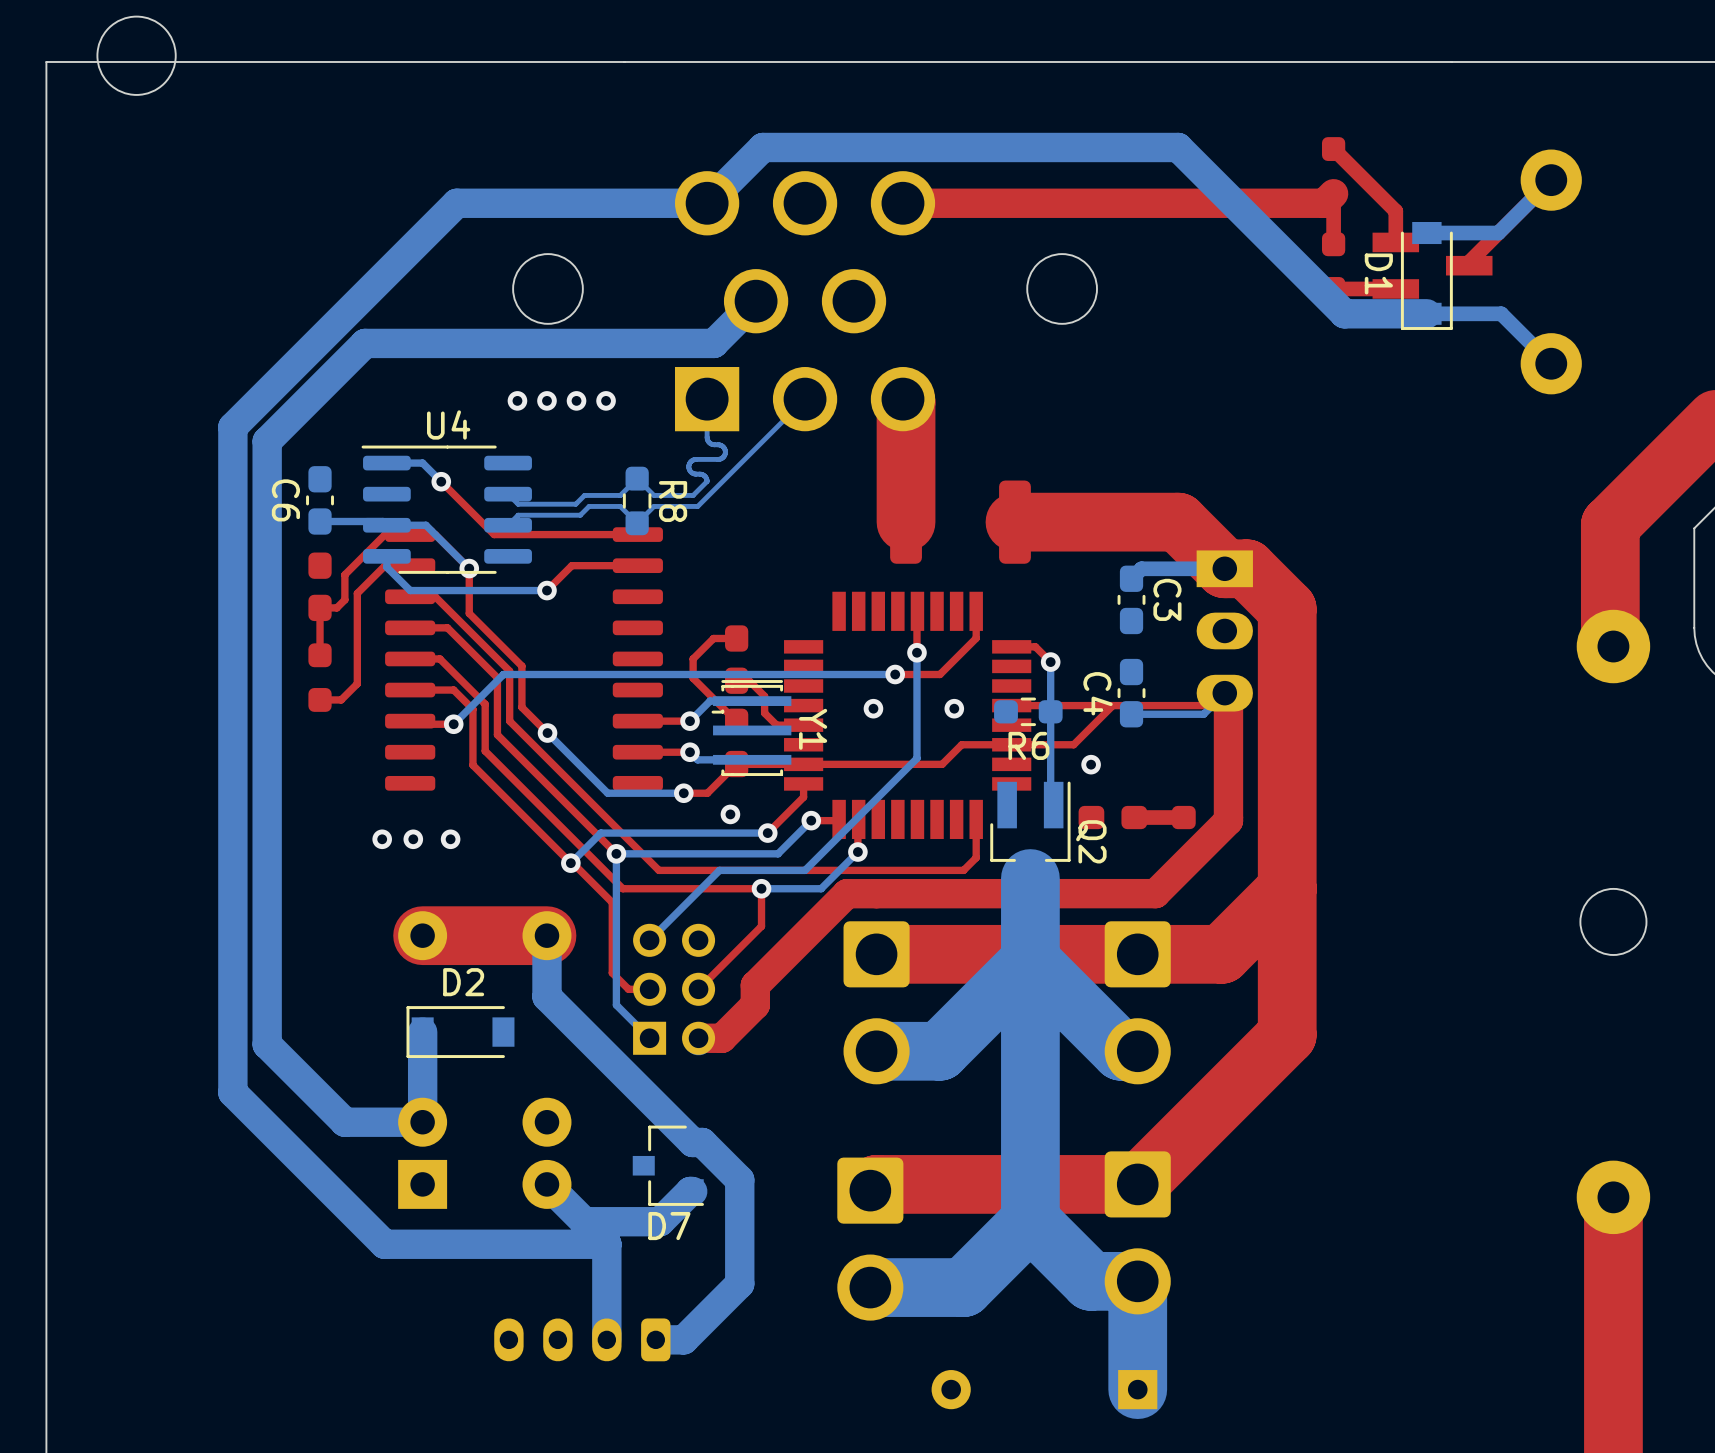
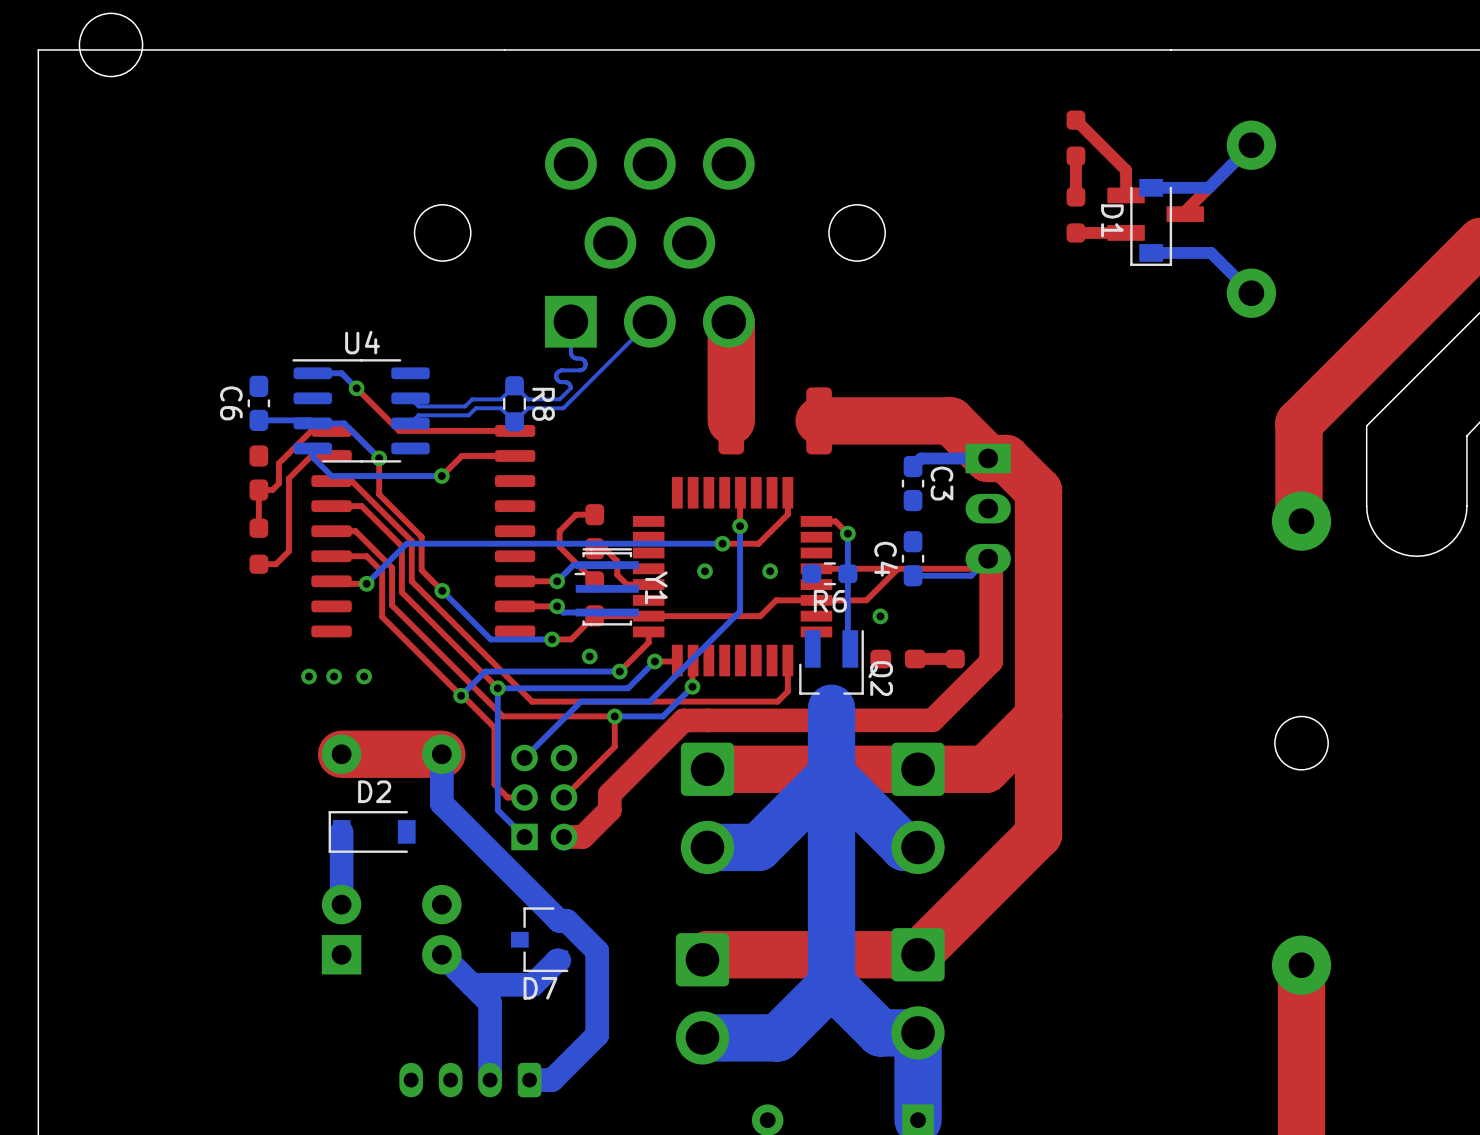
top track: (1333, 193) (1324, 203) (902, 203) -> none
bottom track: (756, 301) (713, 343) (365, 343) (267, 441) (267, 1044) (344, 1122) (422, 1122) -> none
bottom track: (1426, 313) (1344, 313) (1178, 147) (762, 147) (707, 203) (456, 203) (232, 427) (232, 1092) (384, 1244) (606, 1244) -> none
via: (517, 400) -> none
via: (546, 400) -> none
via: (576, 400) -> none
via: (606, 400) -> none

